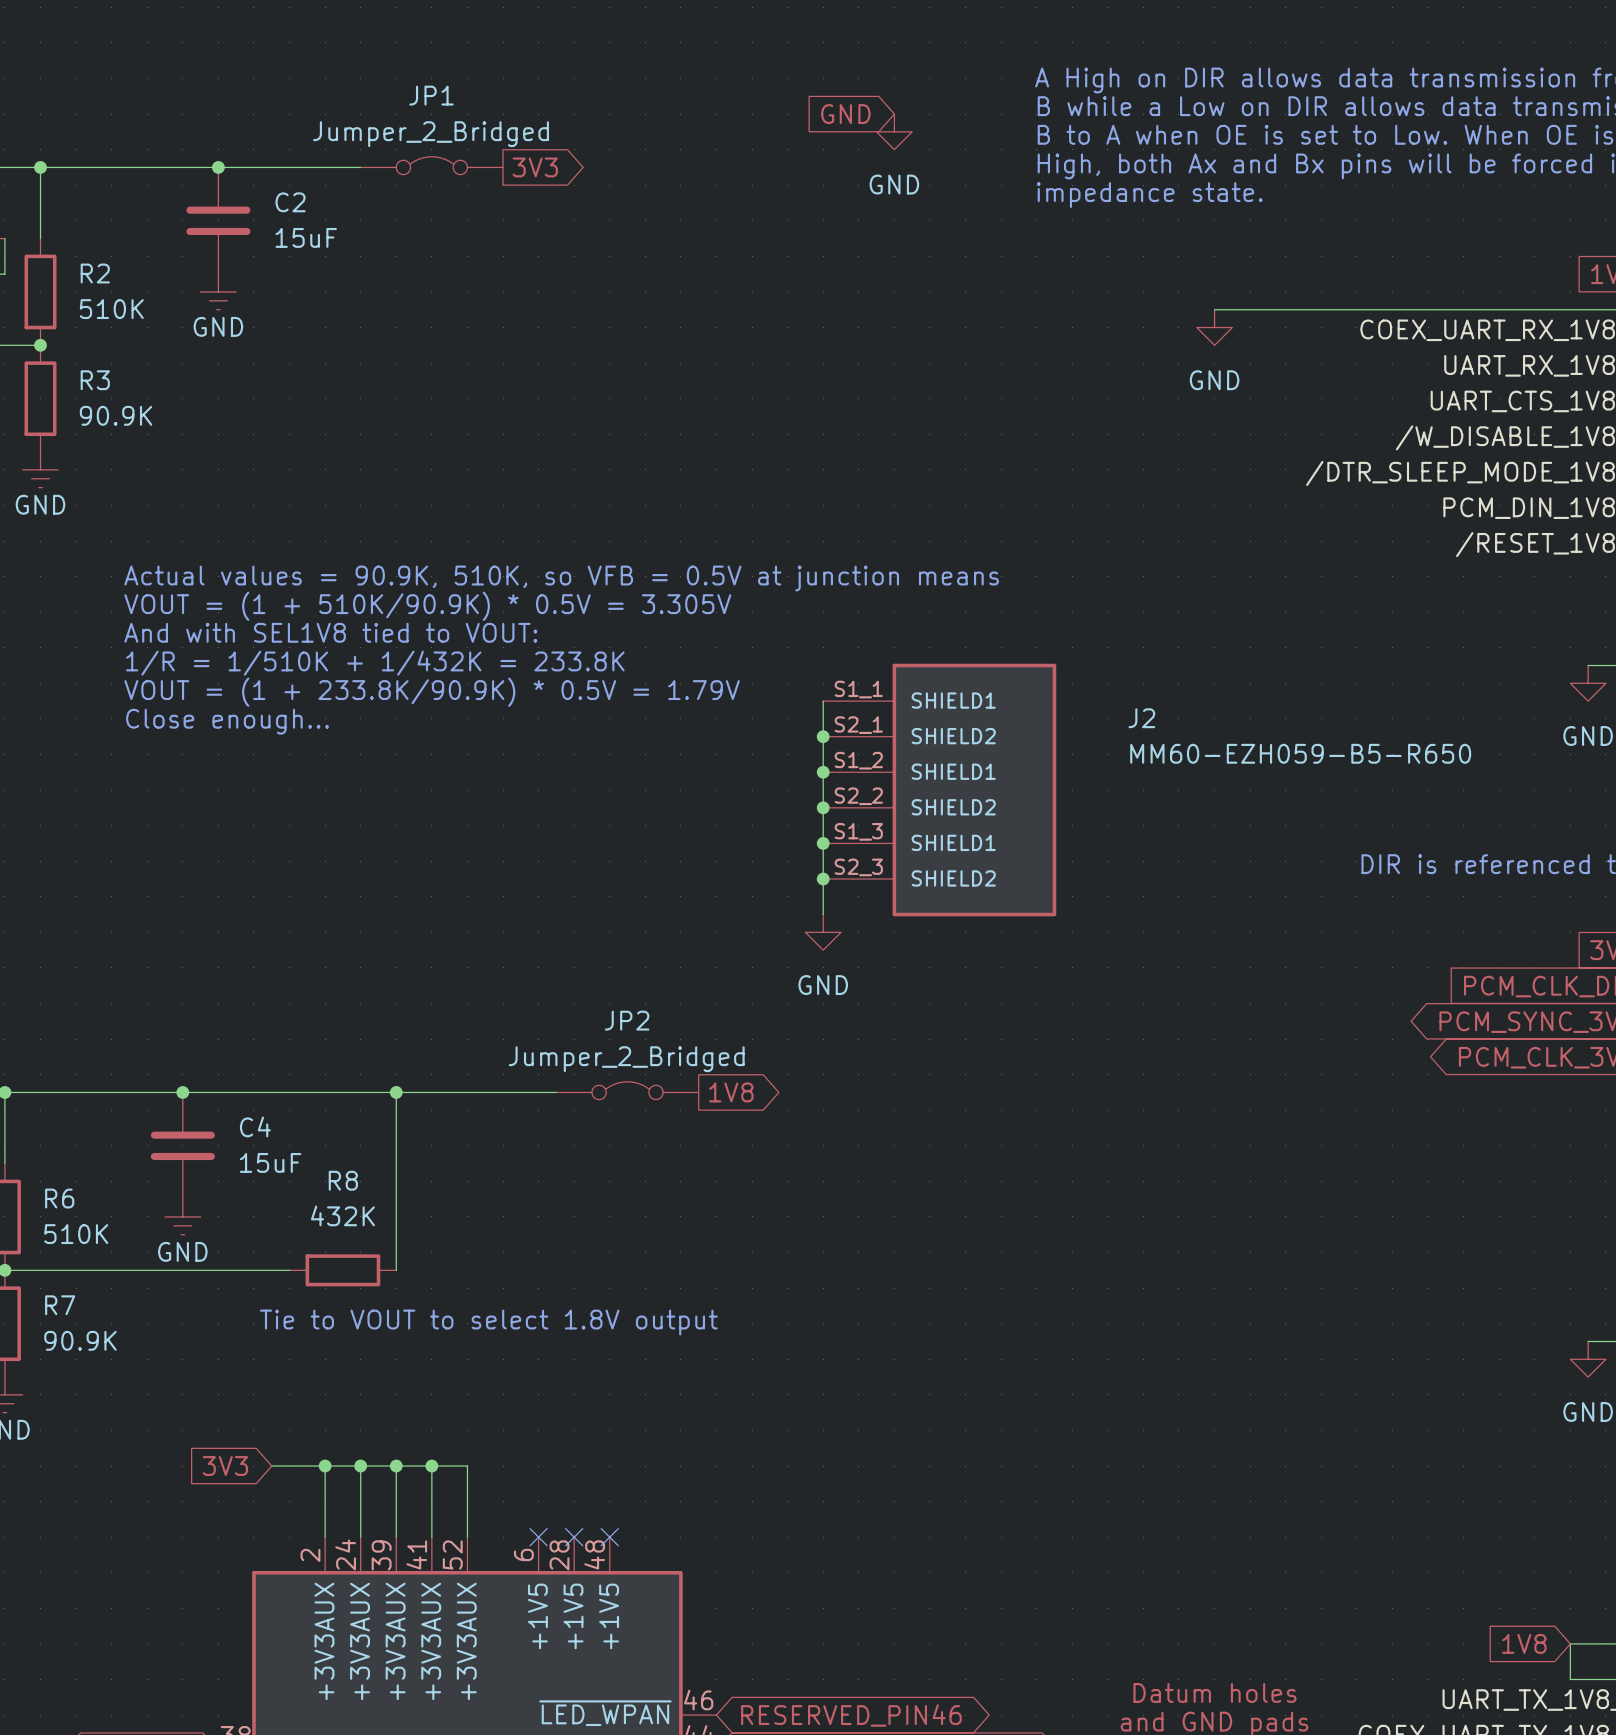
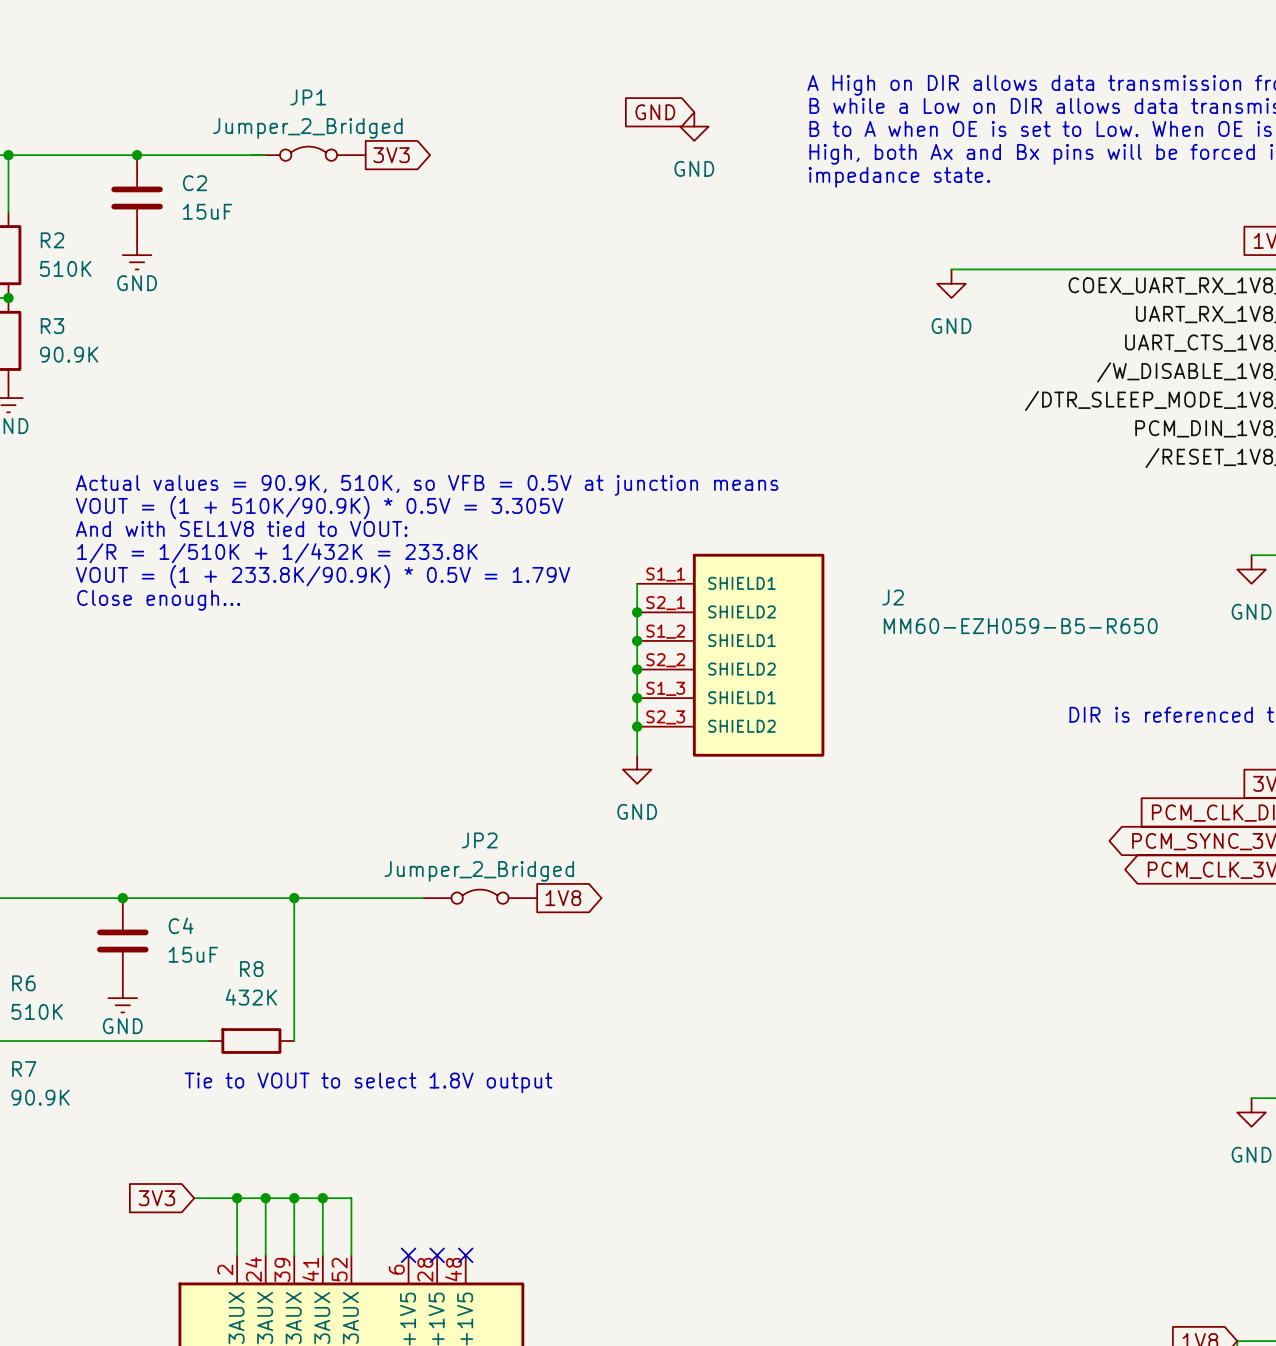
JP1 position: (431, 165) -> (308, 153)
junction position: (218, 167) -> (137, 155)
global label position: 3V3 (535, 167) -> 3V3 (391, 155)
C2 position: (218, 220) -> (137, 198)
power symbol position: GND (218, 291) -> GND (137, 255)

